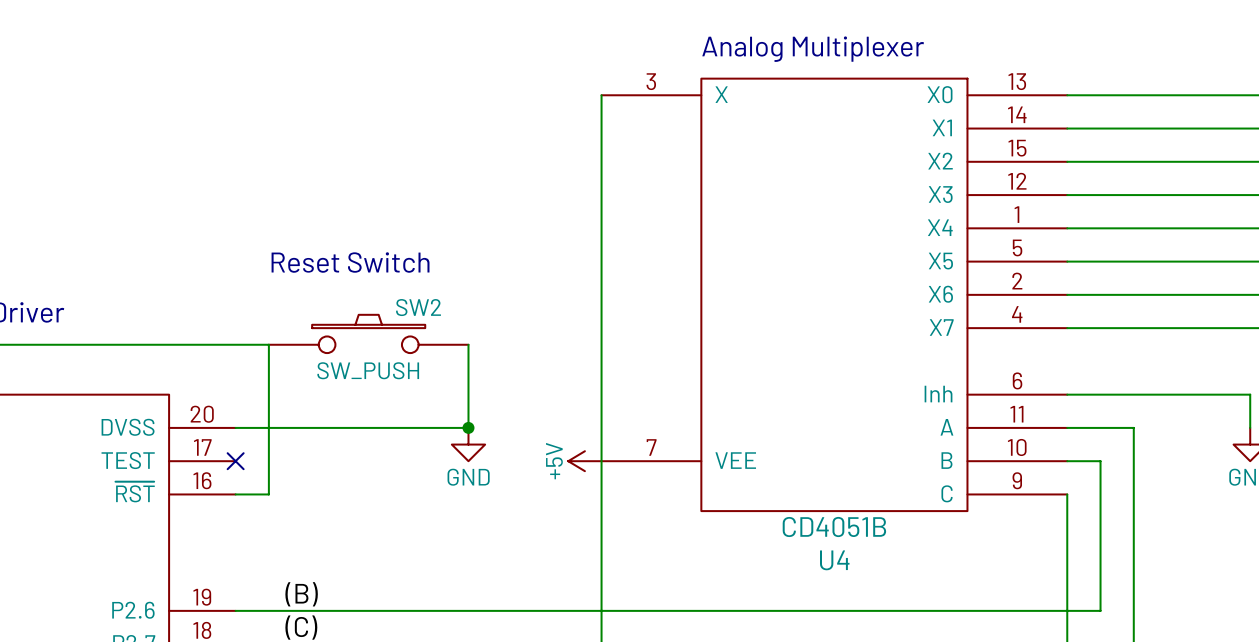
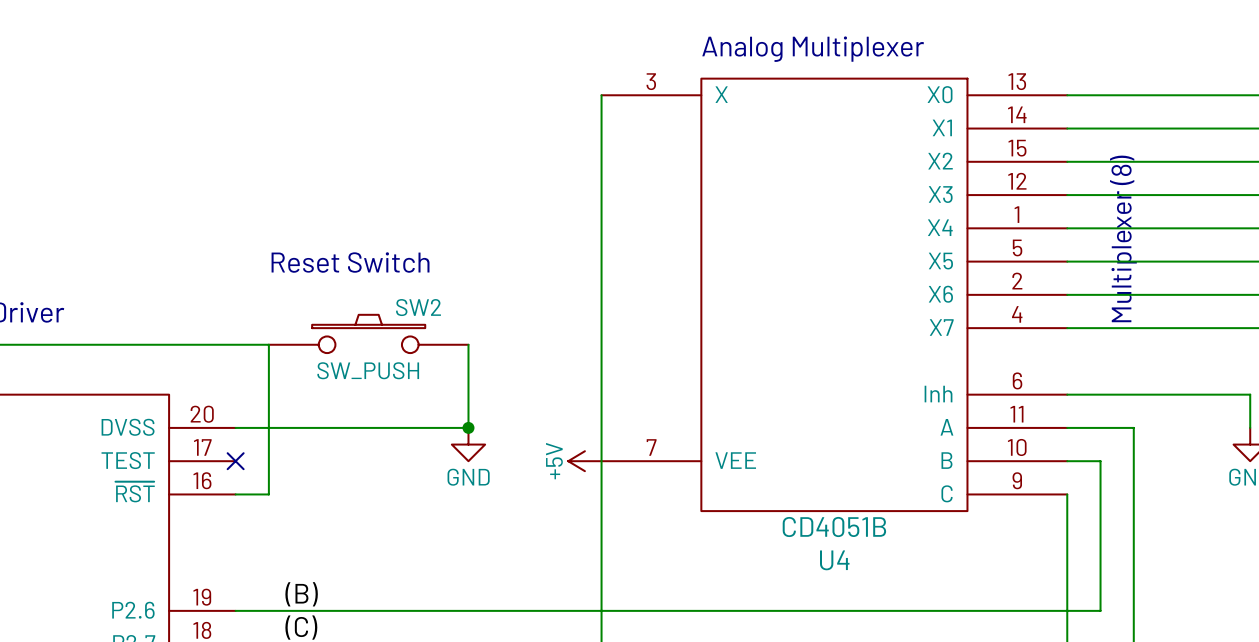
text: none -> Multiplexer (8) (1123, 238)

